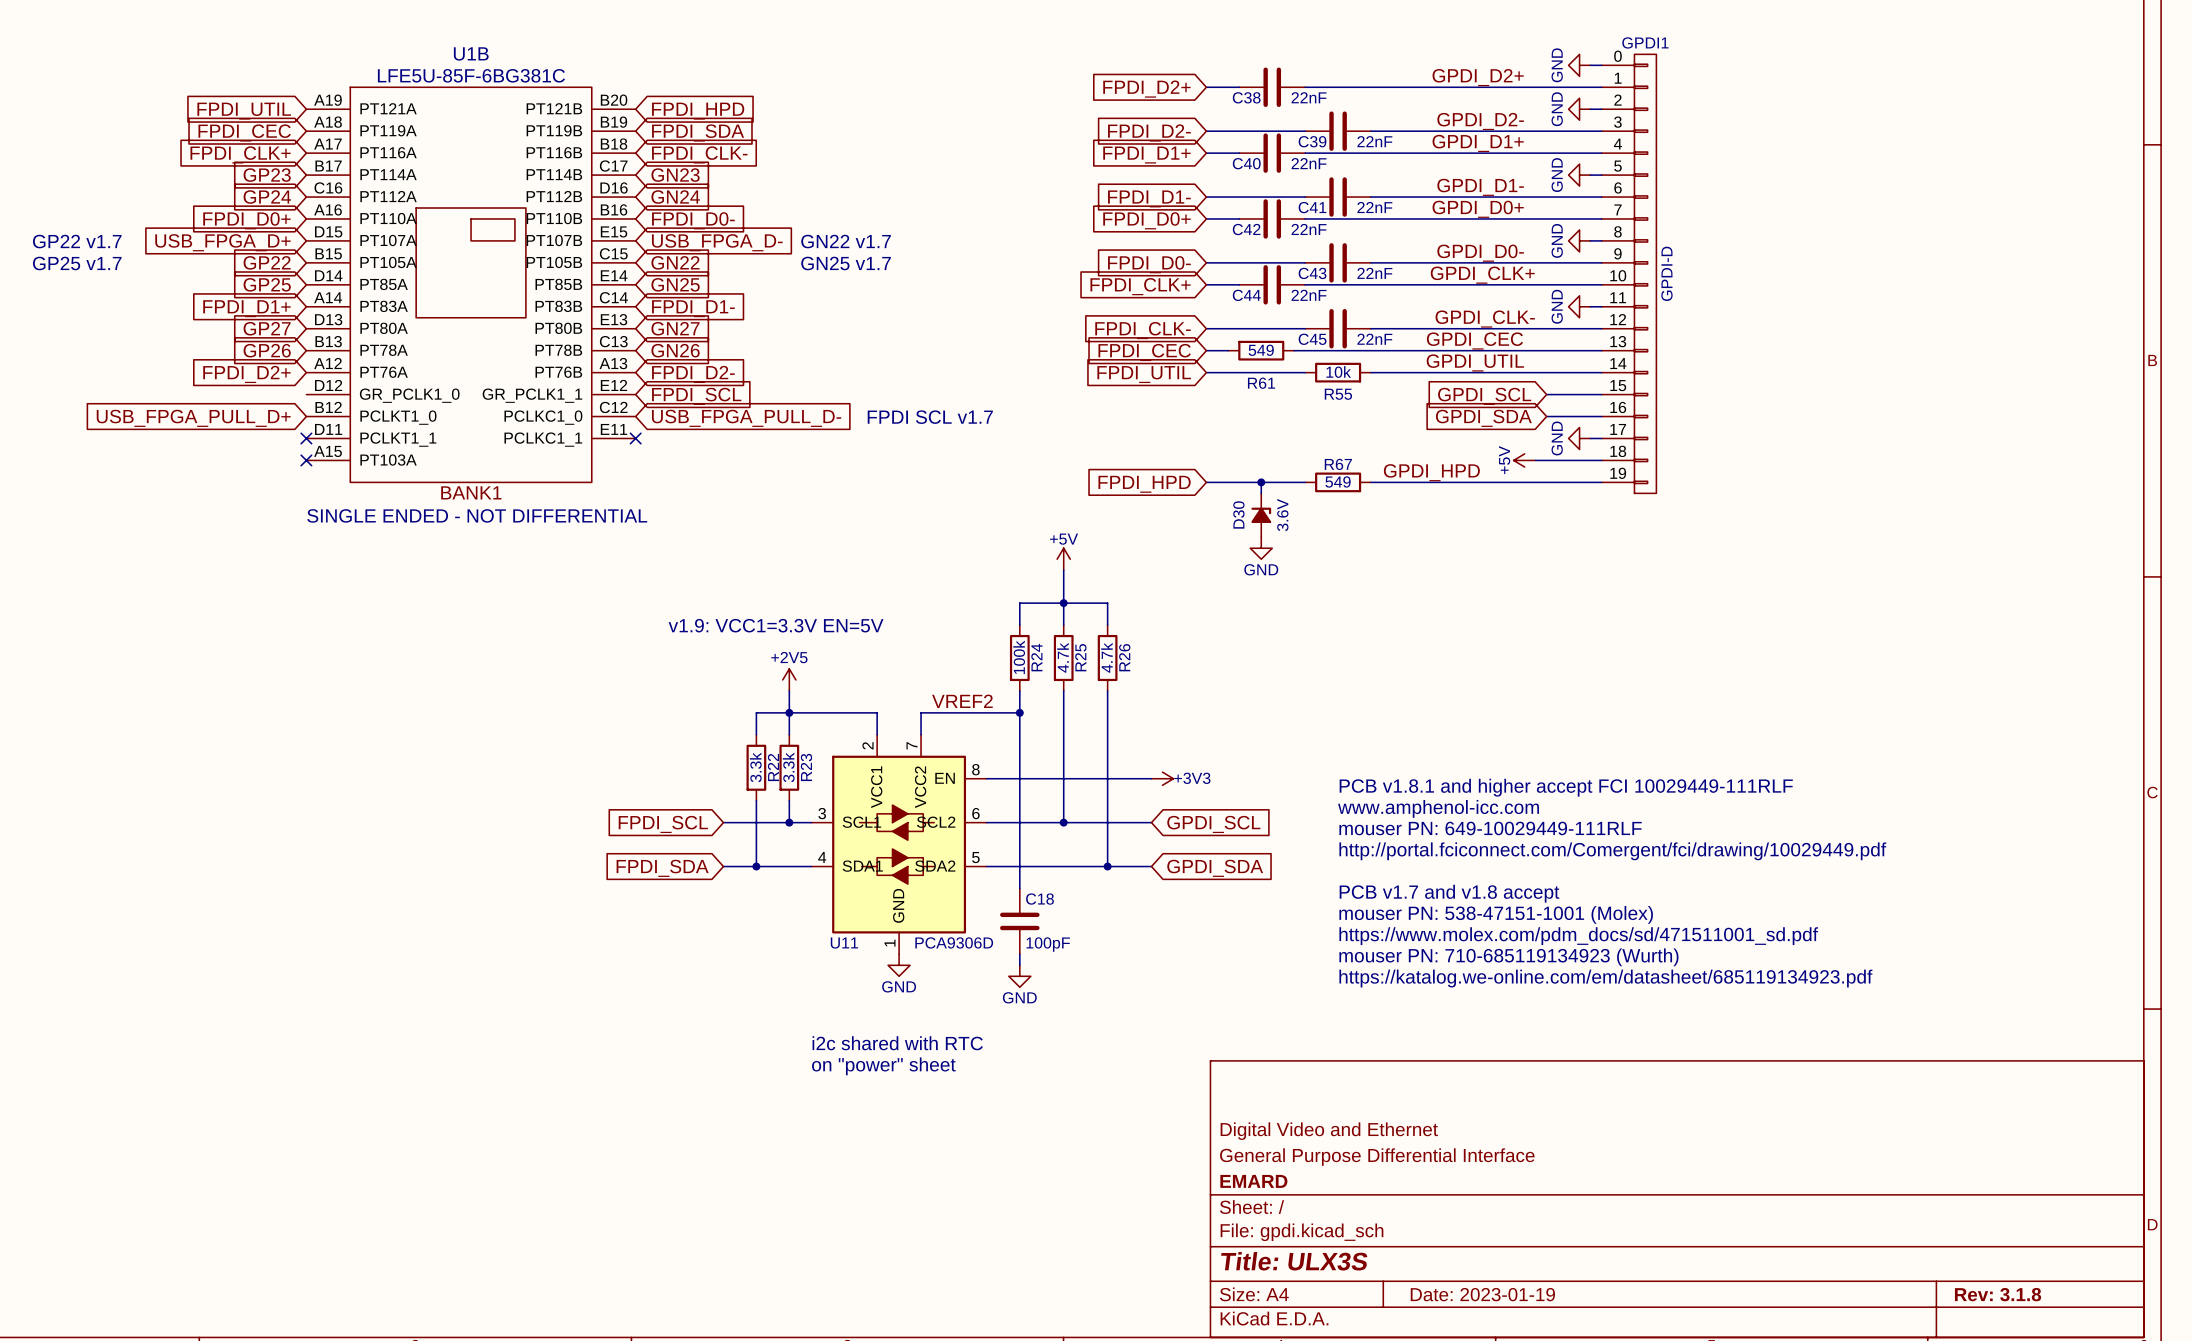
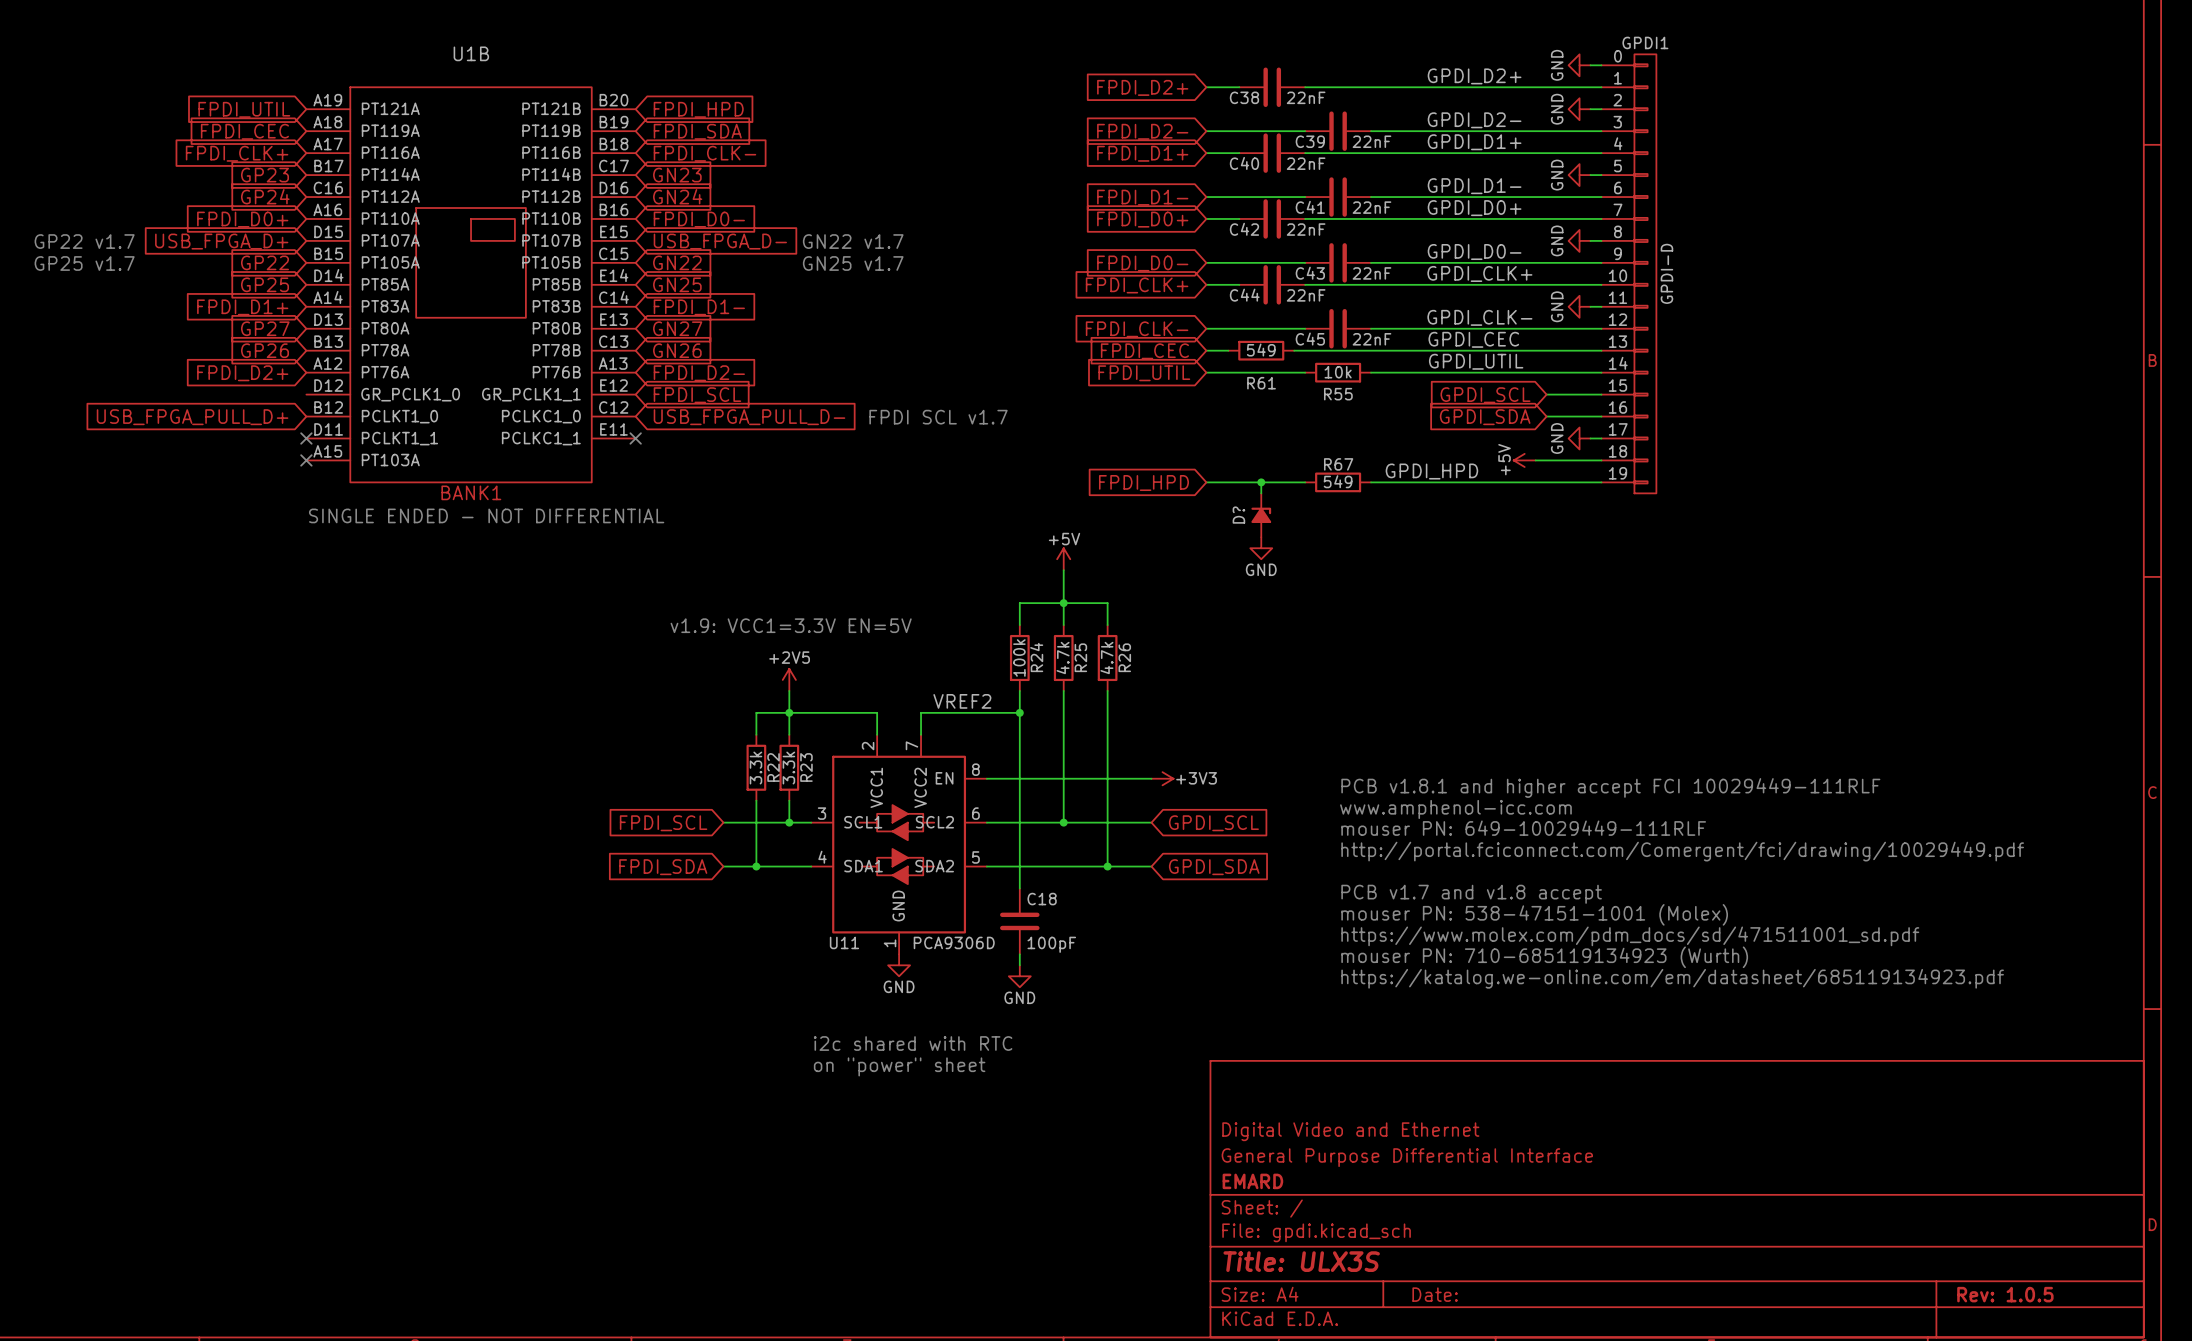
U1B value: LFE5U-85F-6BG381C (471, 75) -> none
D30 name: D30 (1238, 514) -> D? (1238, 515)
D30 value: 3.6V (1282, 515) -> none
title block: Date: 2023-01-19 (1482, 1294) -> Date: (1435, 1294)
title block: Rev: 3.1.8 (1998, 1294) -> Rev: 1.0.5 (2005, 1294)

